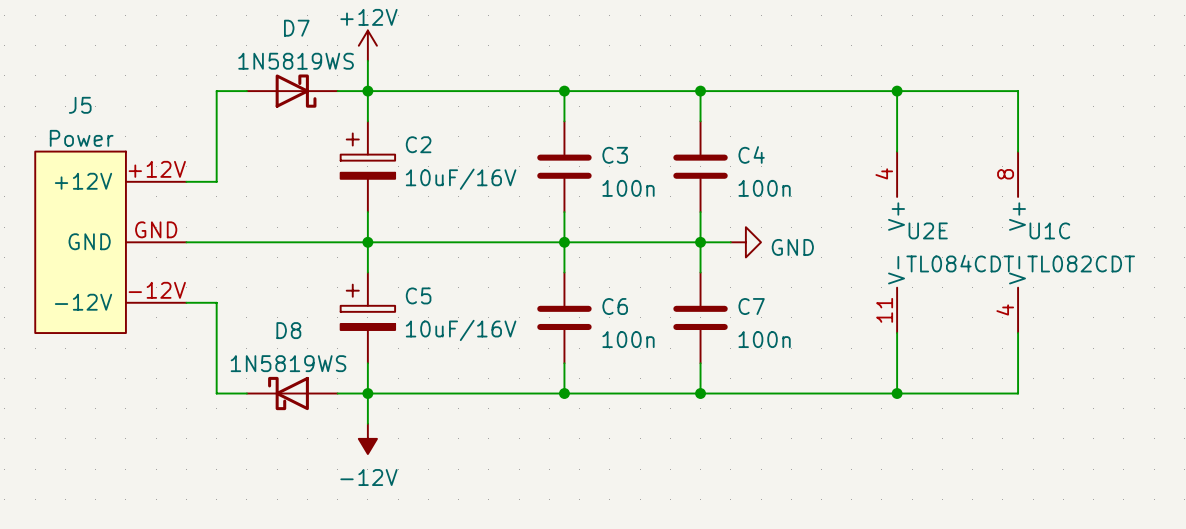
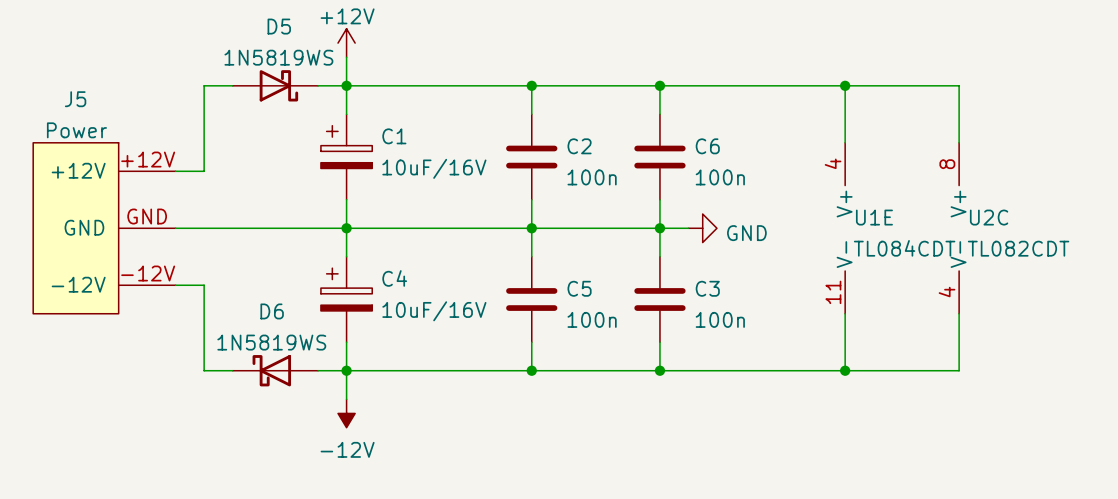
D7 name: D7 (296, 28) -> D5 (279, 26)
C2 name: C2 (418, 144) -> C1 (394, 136)
C4 name: C4 (751, 154) -> C6 (707, 146)
C3 name: C3 (615, 155) -> C2 (579, 146)
U2E name: U2E (928, 230) -> U1E (874, 217)
U1C name: U1C (1049, 230) -> U2C (989, 217)
C5 name: C5 (418, 295) -> C4 (394, 278)
C6 name: C6 (615, 306) -> C5 (579, 288)
C7 name: C7 (751, 306) -> C3 (707, 288)
D8 name: D8 (288, 330) -> D6 (272, 311)

